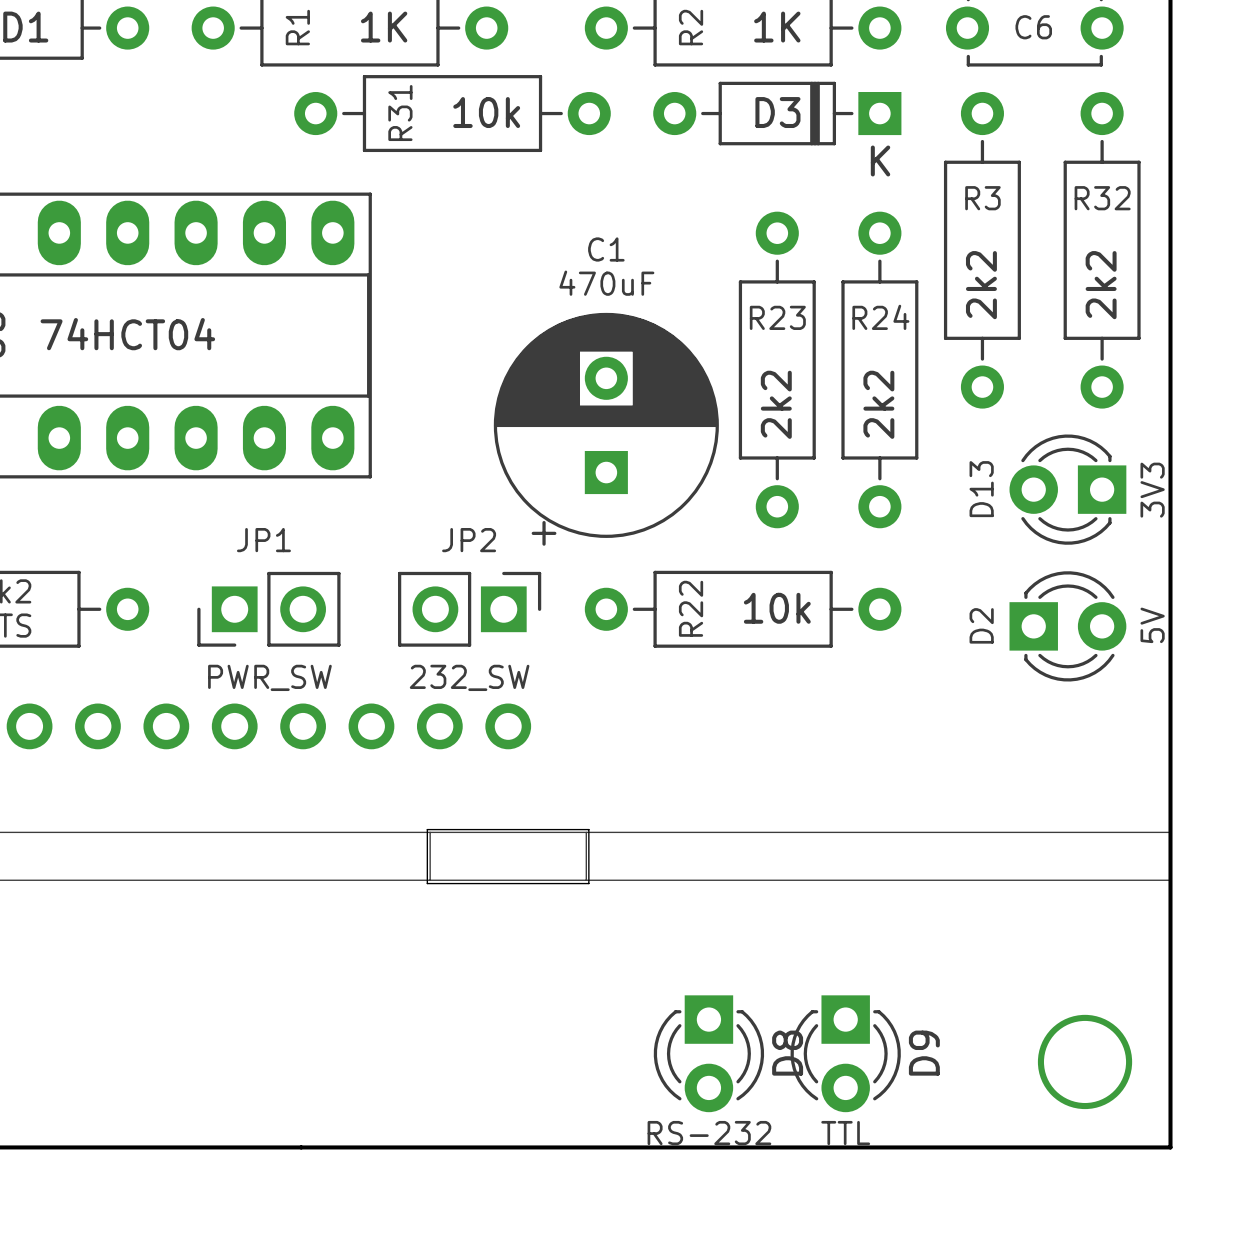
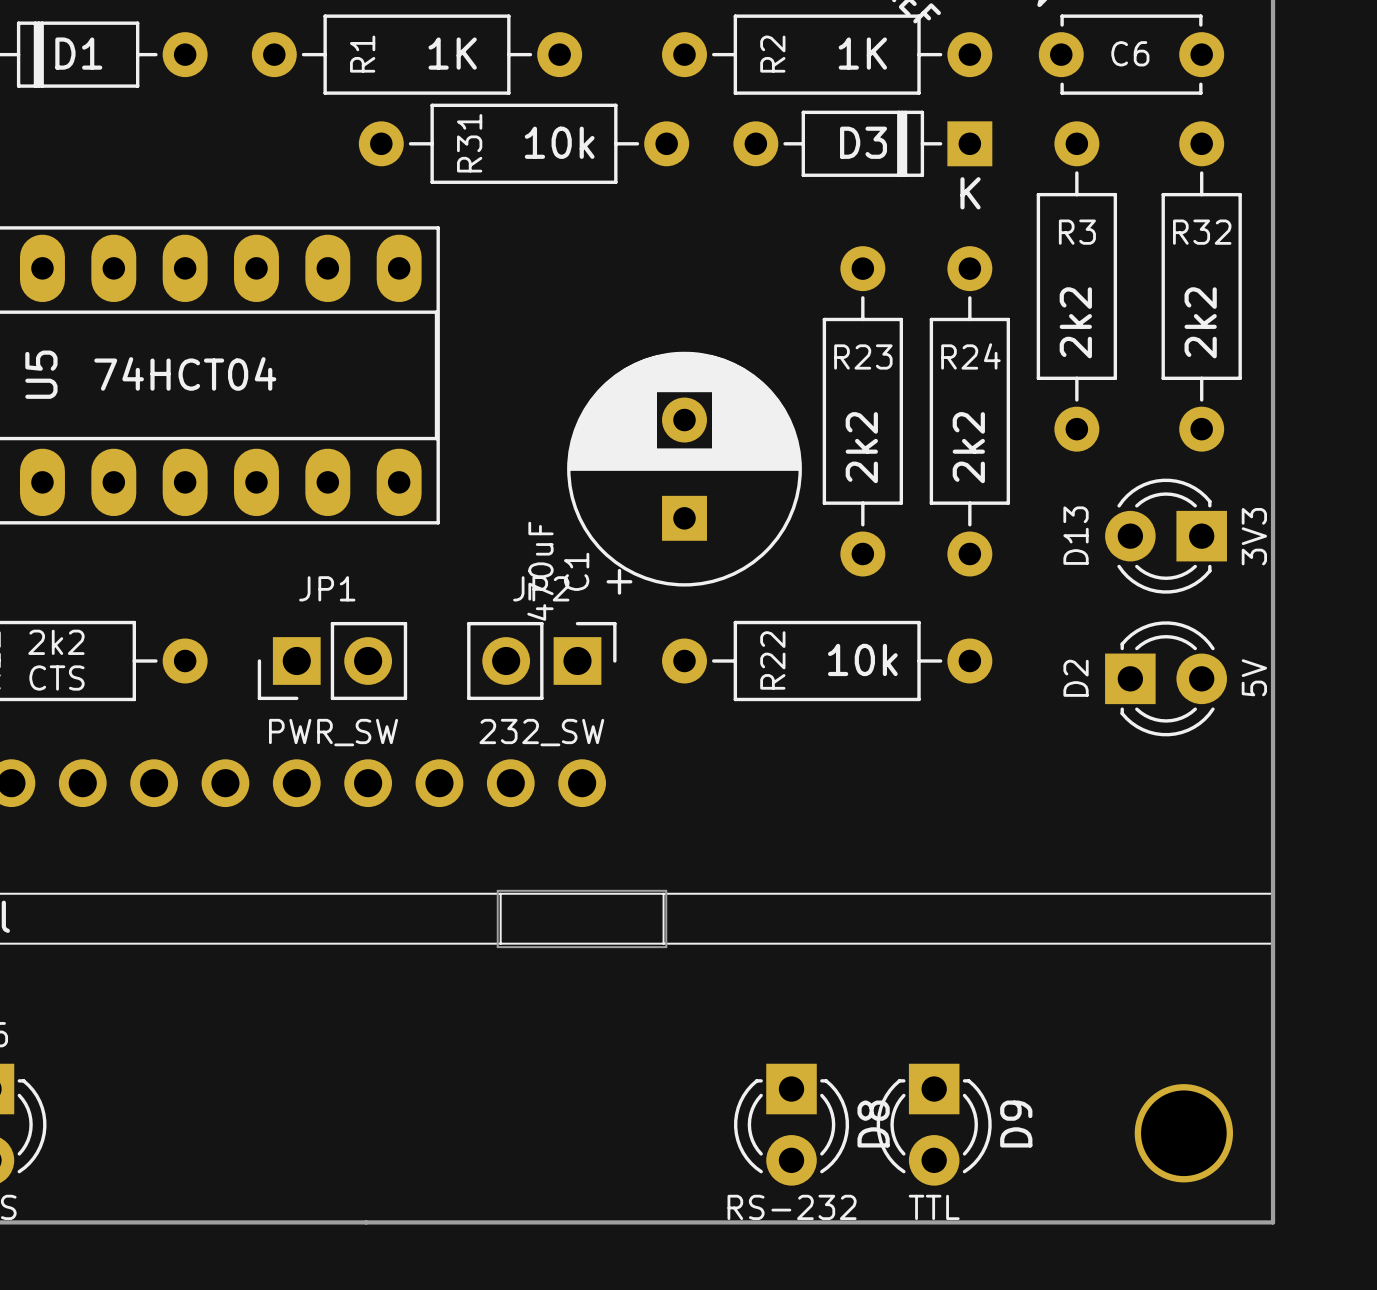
C1 name rotation: 0° (606, 249) -> 90° counterclockwise (576, 571)
C1 name position: C1 (606, 249) -> C1 (576, 571)
C1 value rotation: 0° (606, 283) -> 90° counterclockwise (540, 571)
C1 value position: 470uF (606, 283) -> 470uF (540, 571)

